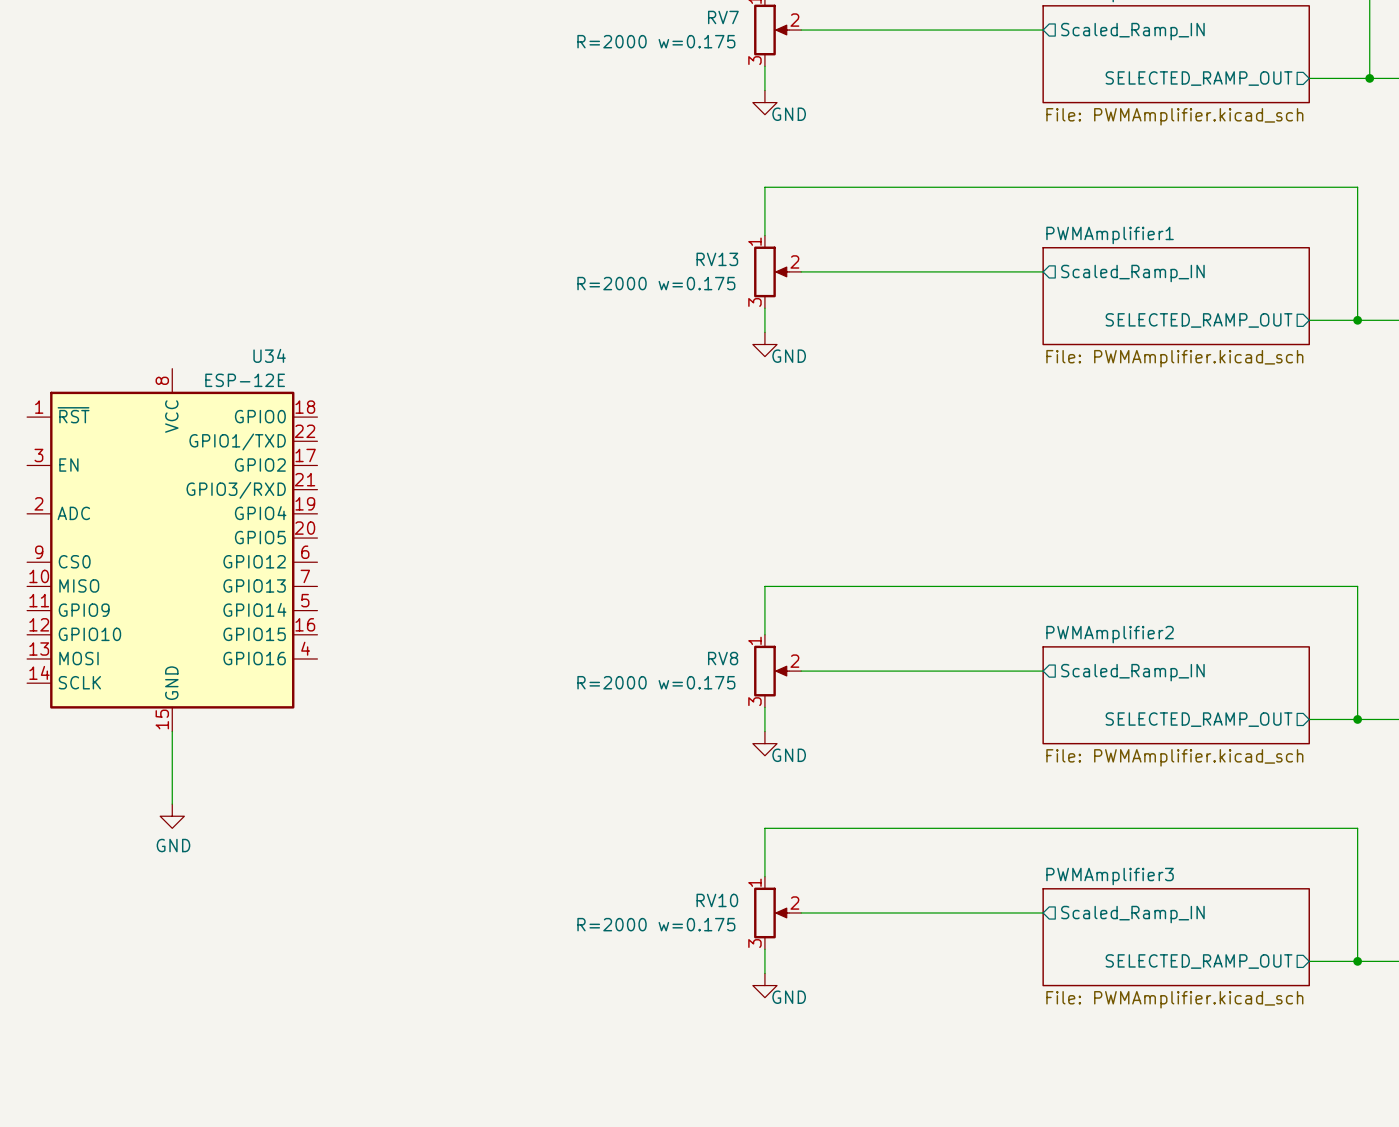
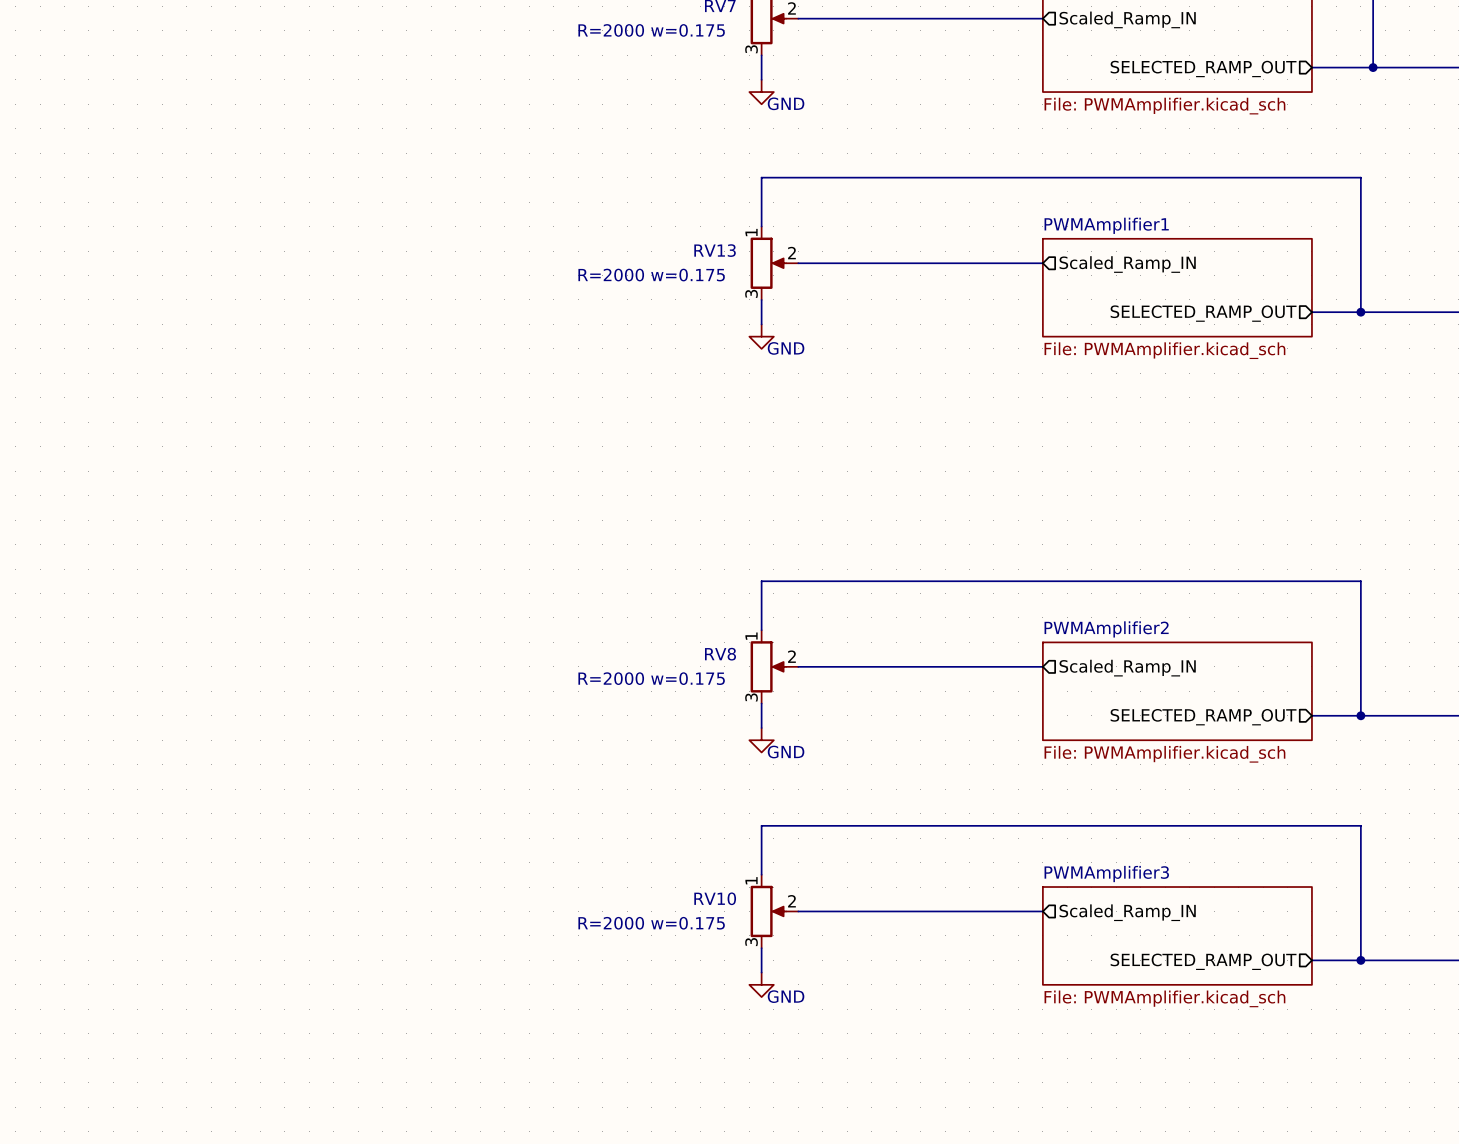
U34: ESP-12E (172, 550) -> none
wire: (172, 731) (172, 804) -> none
power symbol: GND (172, 816) -> none

